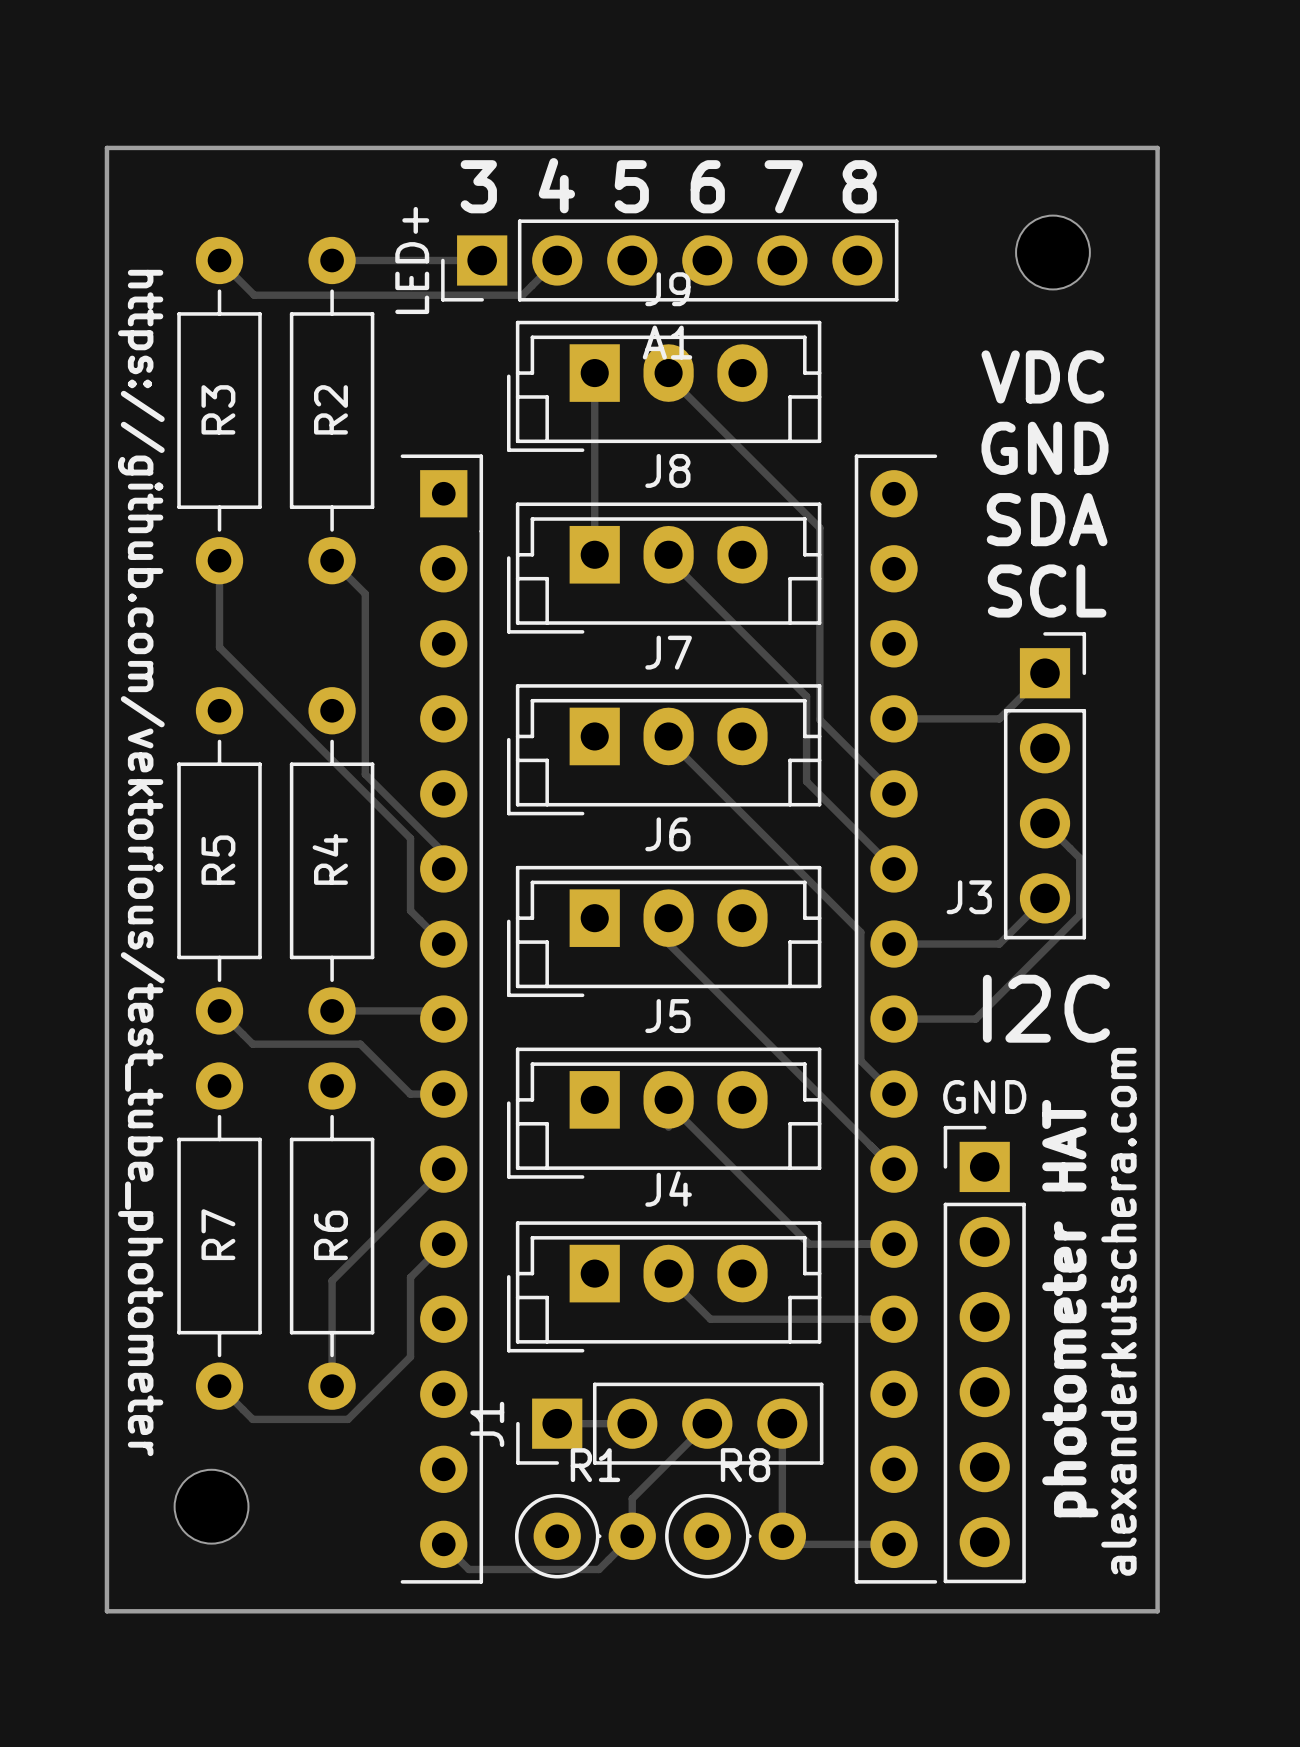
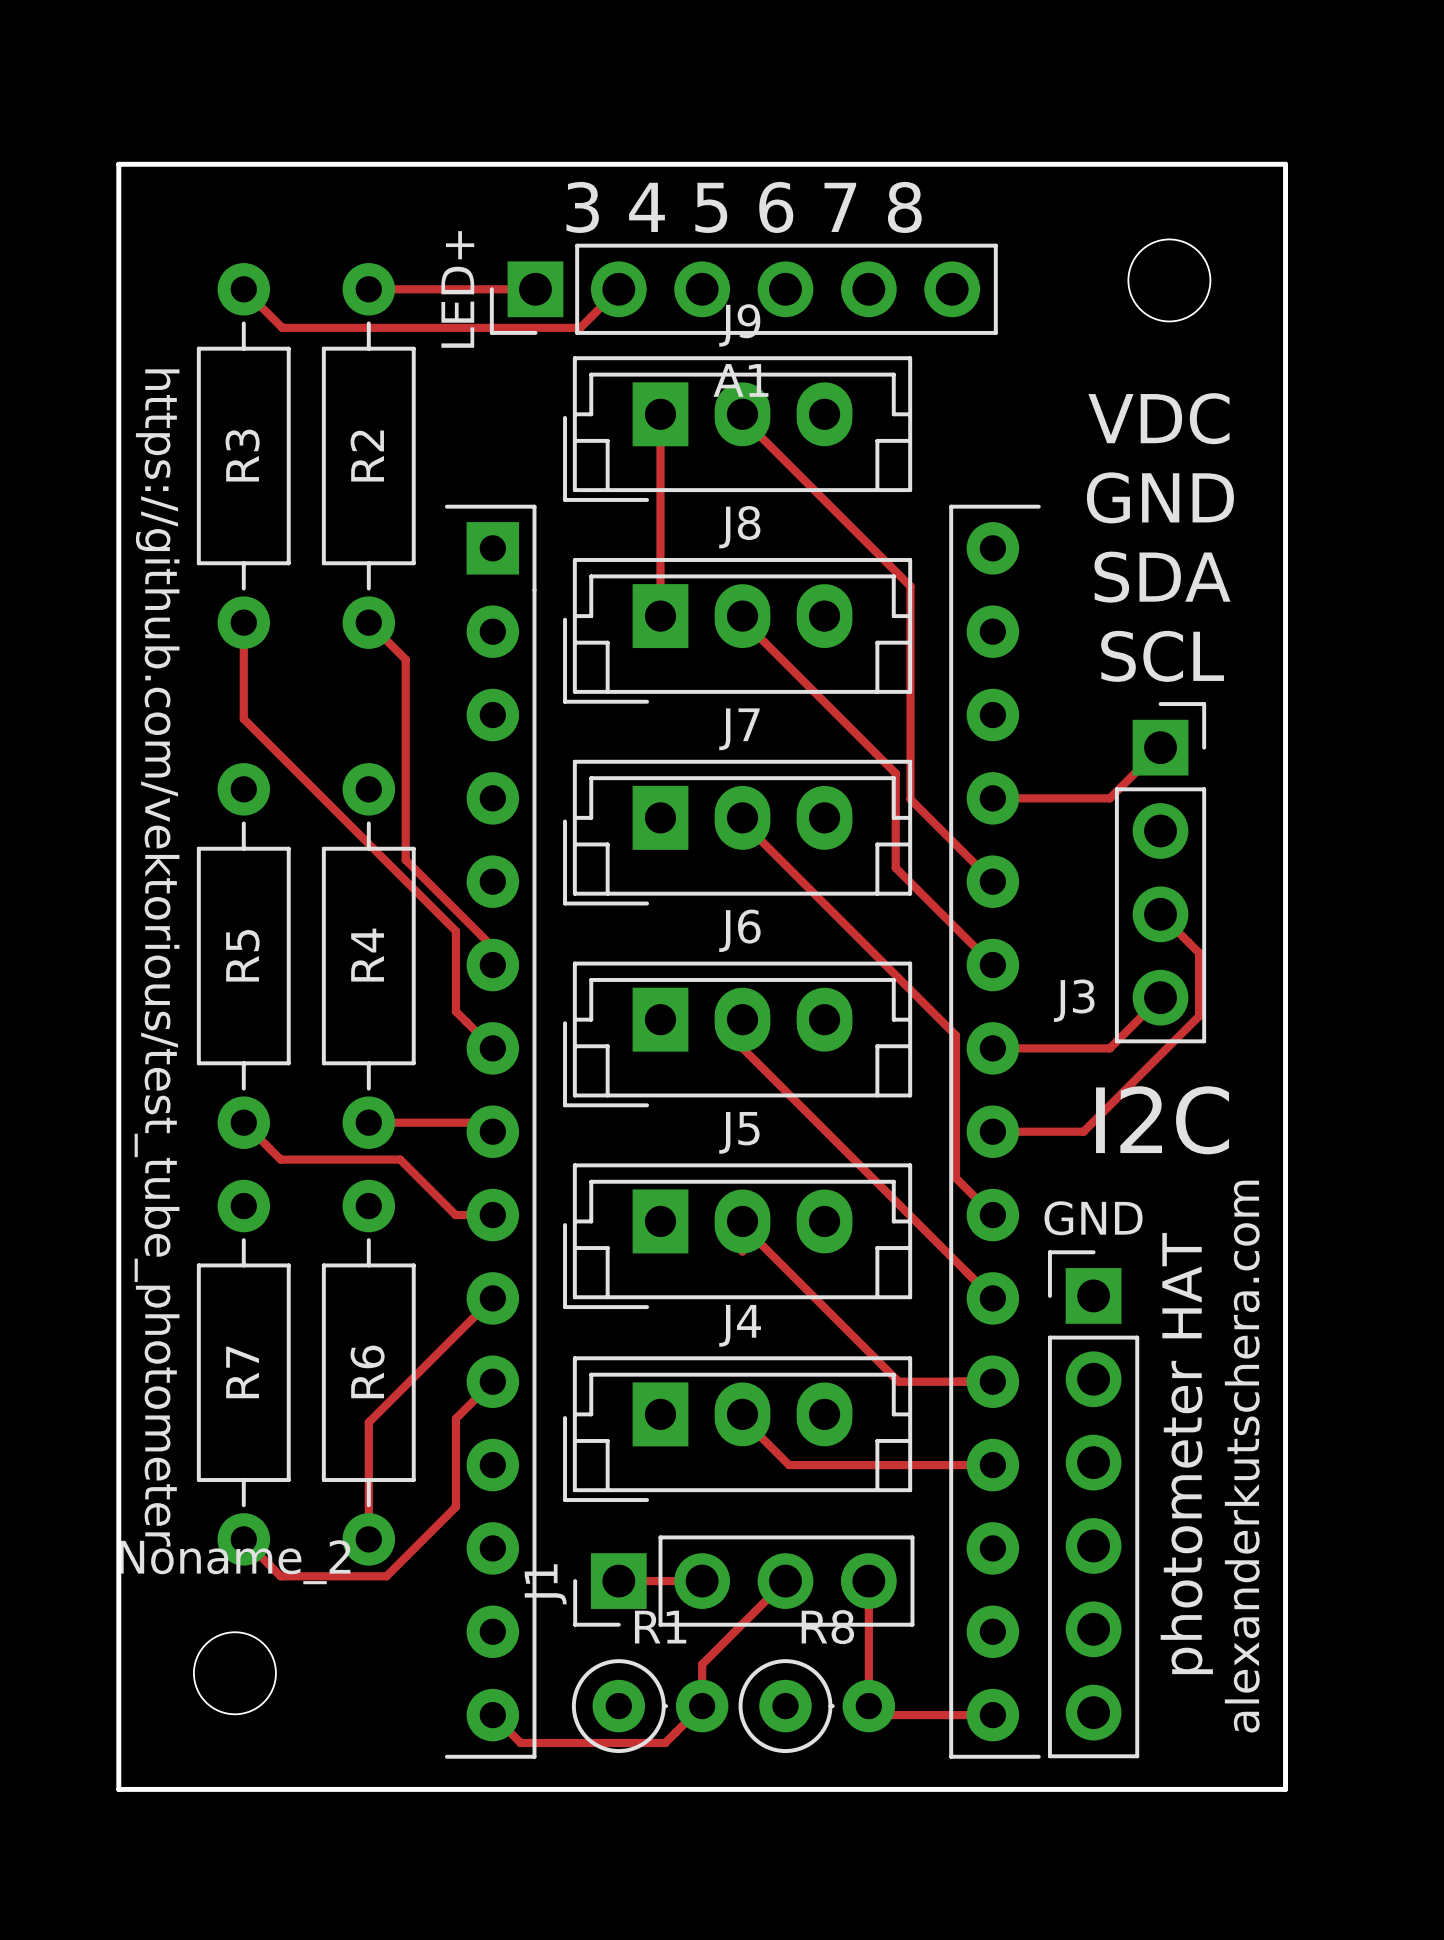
Noname_2 name: none -> Noname_2 (234, 1562)

